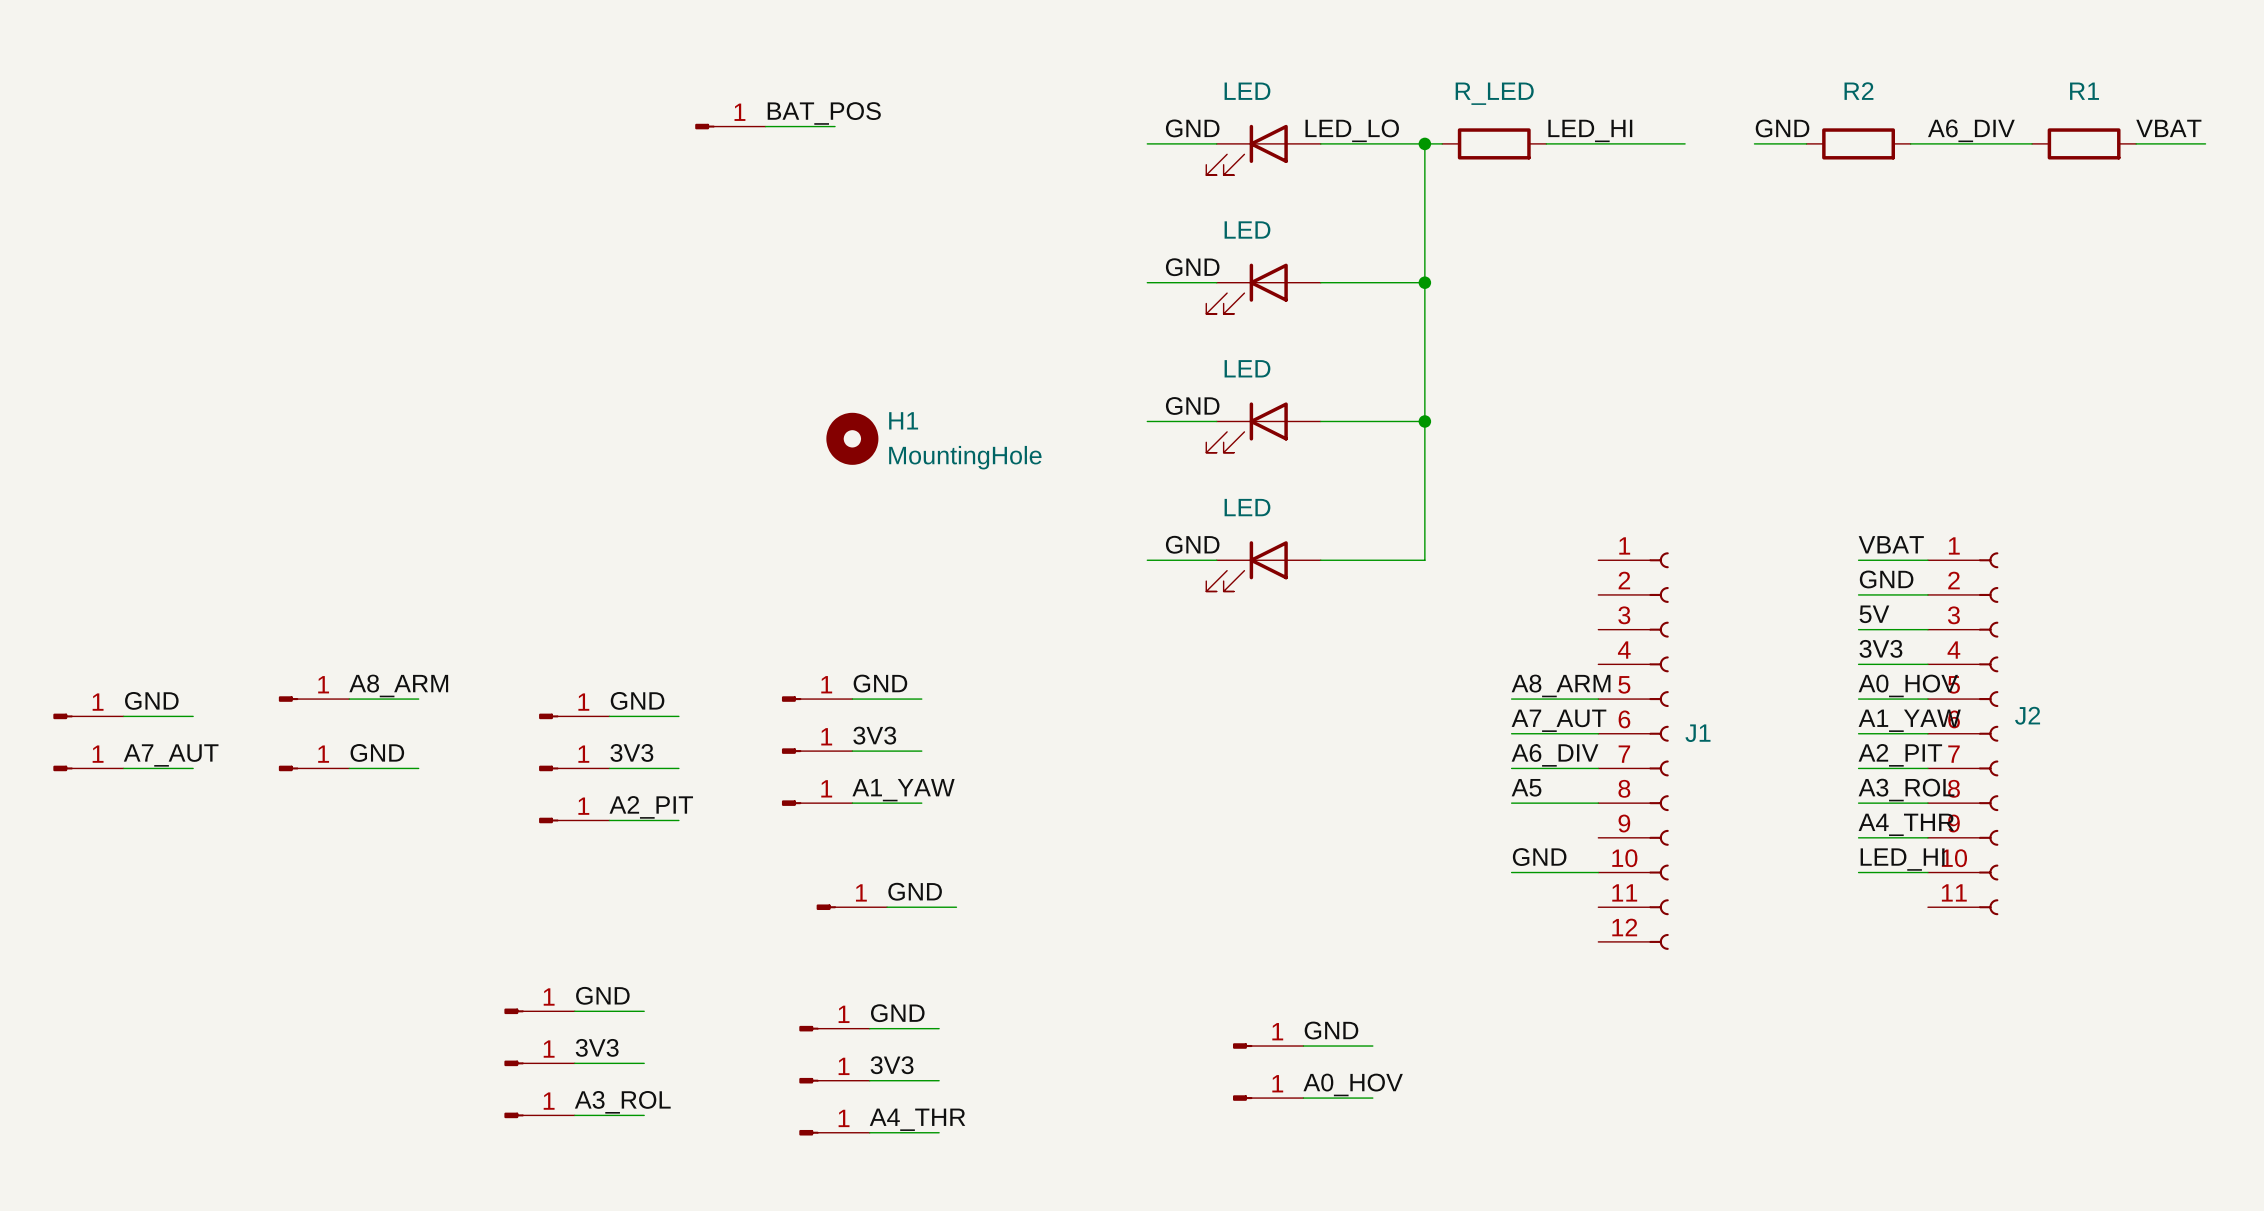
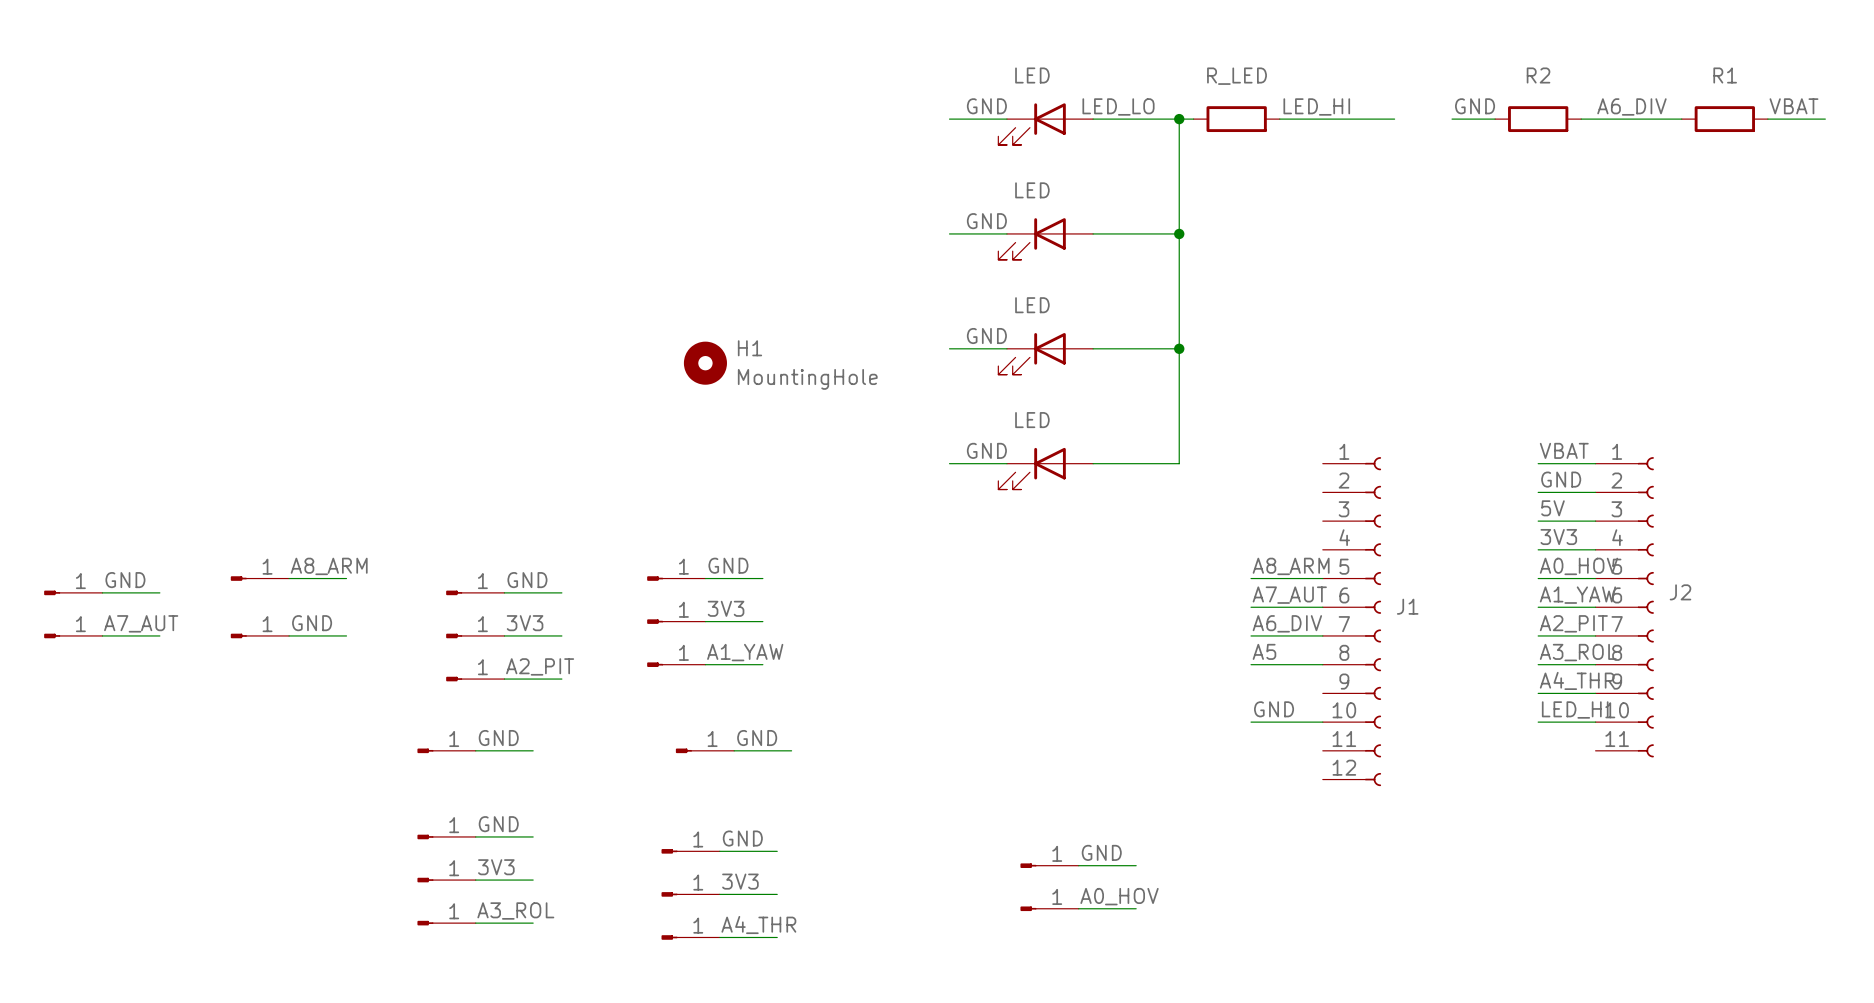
label: BAT_POS (824, 113) -> none
part: (730, 126) -> none
wire: (765, 126) (835, 126) -> none
label: none -> GND (498, 738)
part: none -> (446, 750)
wire: none -> (475, 750) (533, 750)

